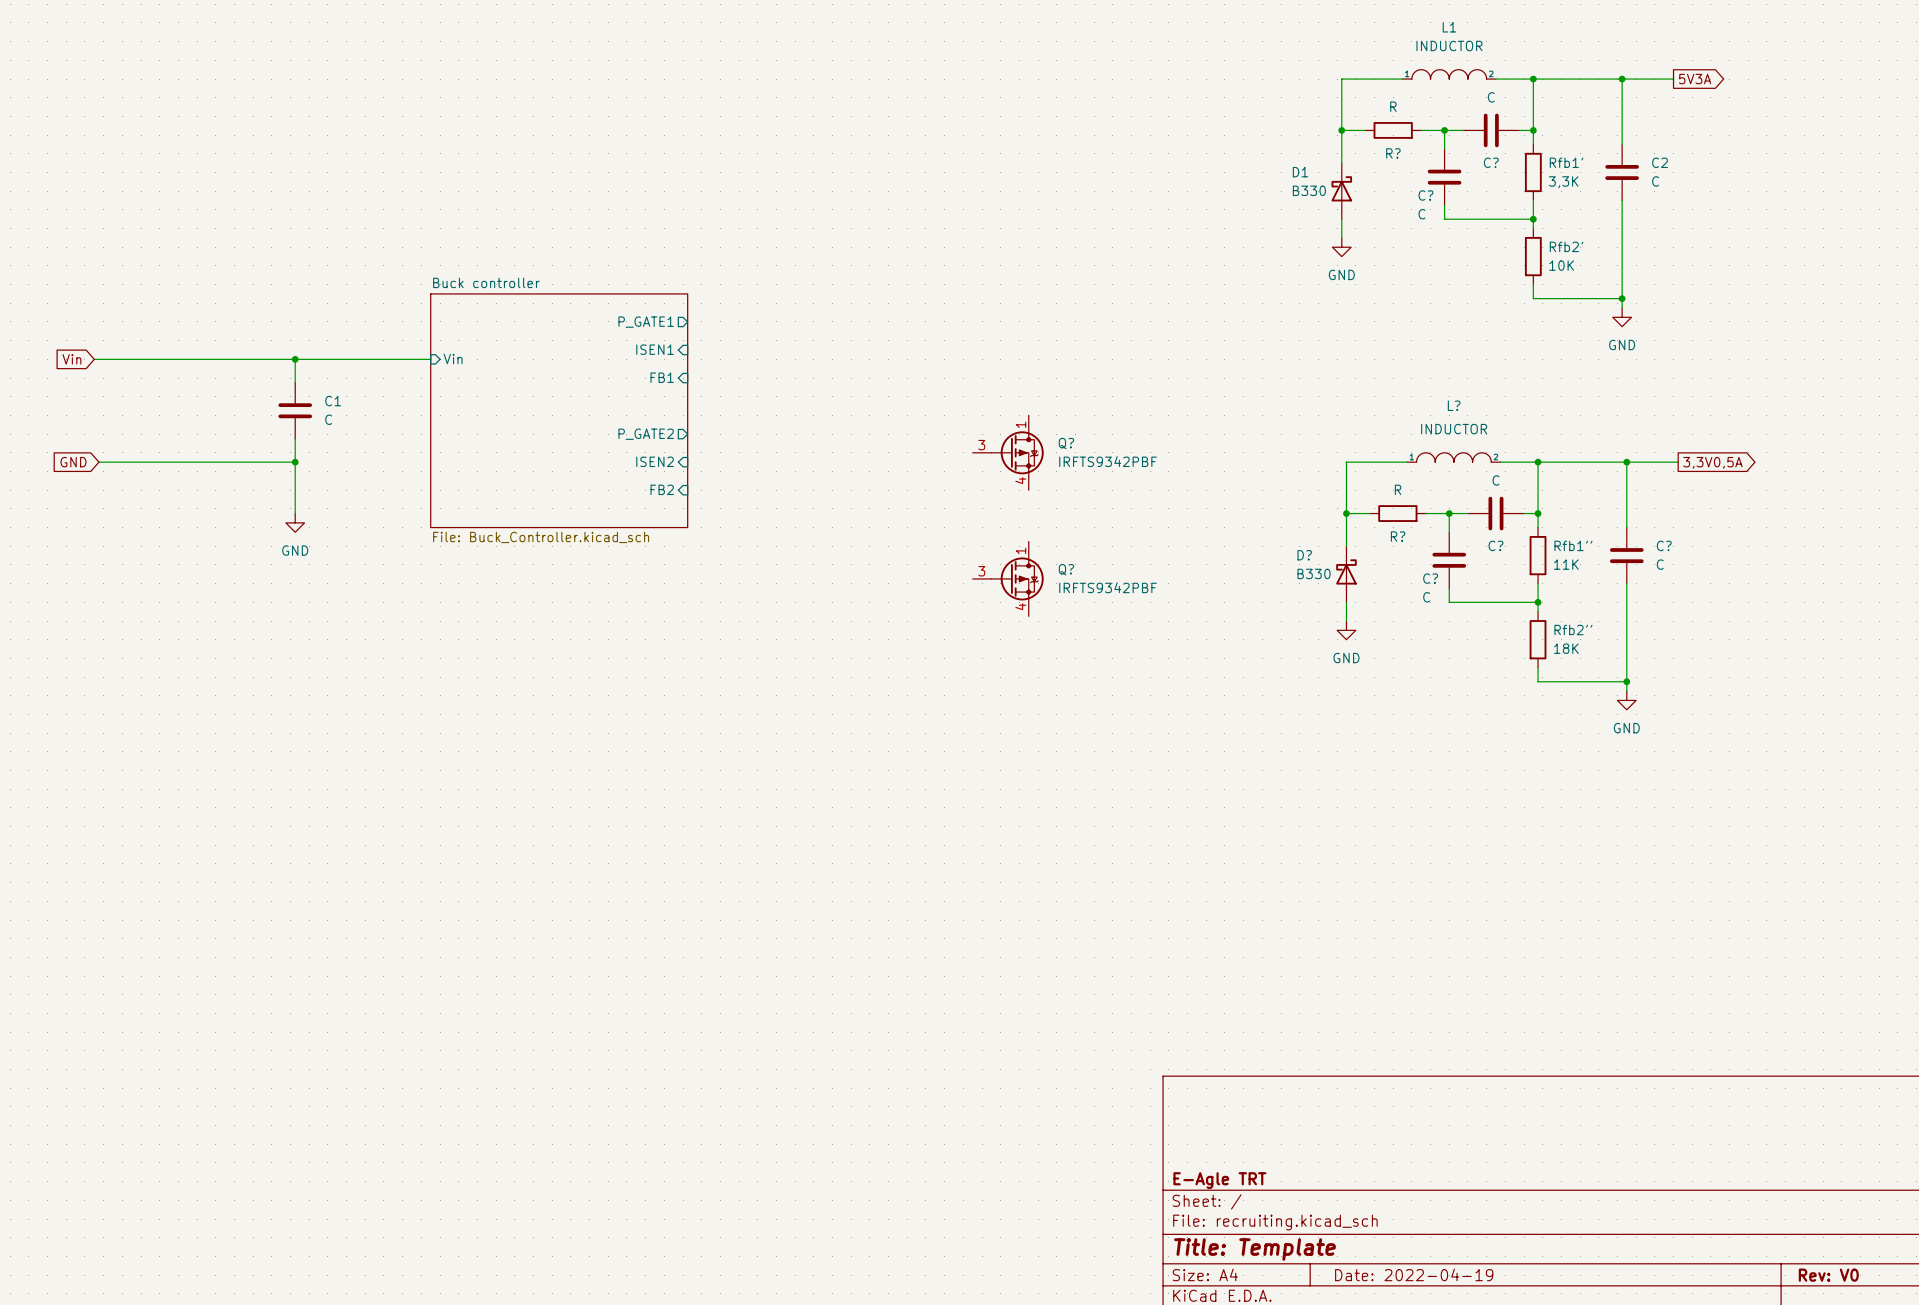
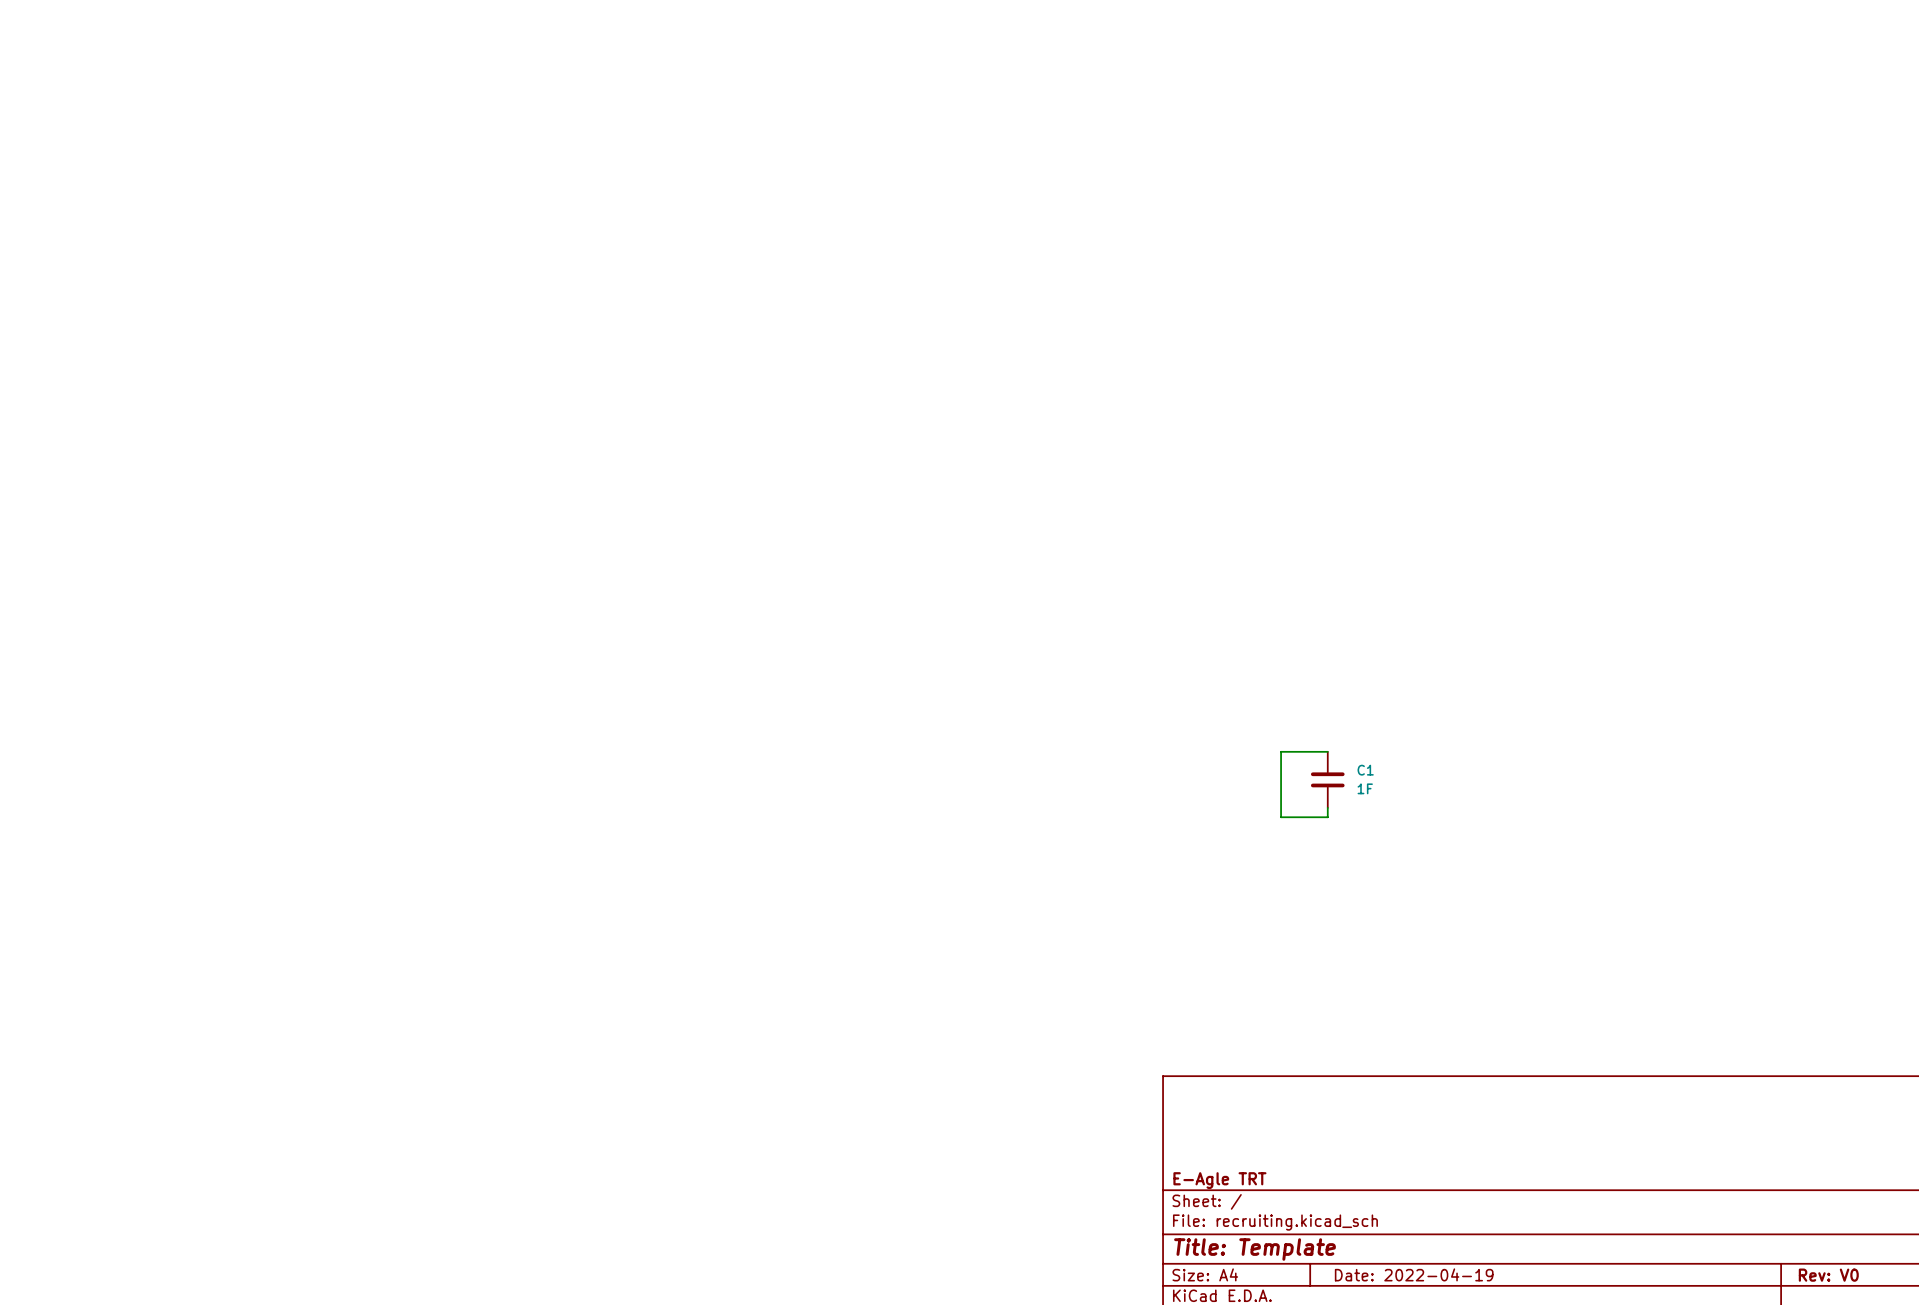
L1: INDUCTOR (1449, 74) -> none
wire: (1402, 79) (1341, 79) (1341, 163) -> none
wire: (1495, 79) (1673, 79) -> none
wire: (1533, 79) (1533, 144) -> none
junction: (1533, 79) -> none
wire: (1622, 79) (1622, 144) -> none
junction: (1622, 79) -> none
global label: 5V3A (1695, 79) -> none
wire: (1341, 130) (1365, 130) -> none
junction: (1341, 130) -> none
R?: R (1393, 130) -> none
wire: (1421, 130) (1463, 130) -> none
wire: (1444, 130) (1444, 149) -> none
junction: (1444, 130) -> none
C?: C (1491, 130) -> none
wire: (1519, 130) (1533, 130) -> none
junction: (1533, 130) -> none
Rfb1': 3,3K (1533, 172) -> none
C2: C (1622, 172) -> none
C?: C (1444, 177) -> none
D1: B330 (1341, 191) -> none
wire: (1533, 200) (1533, 228) -> none
wire: (1622, 200) (1622, 307) -> none
wire: (1444, 205) (1444, 219) (1533, 219) -> none
wire: (1341, 219) (1341, 237) -> none
junction: (1533, 219) -> none
power symbol: GND (1341, 247) -> none
Rfb2': 10K (1533, 256) -> none
wire: (1533, 284) (1533, 298) (1622, 298) -> none
junction: (1622, 298) -> none
power symbol: GND (1622, 317) -> none
sheet pin: P_GATE1 (646, 322) -> none
sheet pin: ISEN1 (655, 349) -> none
global label: Vin (71, 359) -> none
wire: (94, 359) (430, 359) -> none
wire: (295, 359) (295, 382) -> none
junction: (295, 359) -> none
sheet pin: Vin (453, 359) -> none
sheet pin: FB1 (662, 377) -> none
C1 position: (295, 410) -> (1327, 779)
sheet Buck controller: File: Buck_Controller.kicad_sch (559, 410) -> none
C1 value: C (328, 419) -> 1F (1365, 788)
sheet pin: P_GATE2 (646, 434) -> none
wire: (295, 438) (295, 513) -> none
Q?: IRFTS9342PBF (1008, 452) -> none
L?: INDUCTOR (1453, 457) -> none
sheet pin: ISEN2 (655, 461) -> none
global label: GND (73, 462) -> none
wire: (98, 462) (295, 462) -> none
junction: (295, 462) -> none
wire: (1407, 462) (1346, 462) (1346, 546) -> none
wire: (1500, 462) (1678, 462) -> none
wire: (1538, 462) (1538, 527) -> none
junction: (1538, 462) -> none
wire: (1626, 462) (1626, 527) -> none
junction: (1626, 462) -> none
global label: 3,3V0,5A (1712, 462) -> none
sheet pin: FB2 (662, 489) -> none
wire: (1346, 513) (1369, 513) -> none
junction: (1346, 513) -> none
R?: R (1397, 513) -> none
wire: (1425, 513) (1467, 513) -> none
wire: (1449, 513) (1449, 532) -> none
junction: (1449, 513) -> none
C?: C (1495, 513) -> none
wire: (1524, 513) (1538, 513) -> none
junction: (1538, 513) -> none
power symbol: GND (295, 522) -> none
Rfb1'': 11K (1538, 555) -> none
C?: C (1626, 555) -> none
C?: C (1449, 560) -> none
D?: B330 (1346, 574) -> none
Q?: IRFTS9342PBF (1008, 578) -> none
wire: (1538, 583) (1538, 611) -> none
wire: (1626, 583) (1626, 691) -> none
wire: (1449, 588) (1449, 602) (1538, 602) -> none
wire: (1346, 602) (1346, 621) -> none
junction: (1538, 602) -> none
power symbol: GND (1346, 630) -> none
Rfb2'': 18K (1538, 639) -> none
wire: (1538, 667) (1538, 681) (1626, 681) -> none
junction: (1626, 681) -> none
power symbol: GND (1626, 700) -> none
wire: none -> (1327, 751) (1281, 751) (1281, 817) (1327, 817) (1327, 807)

